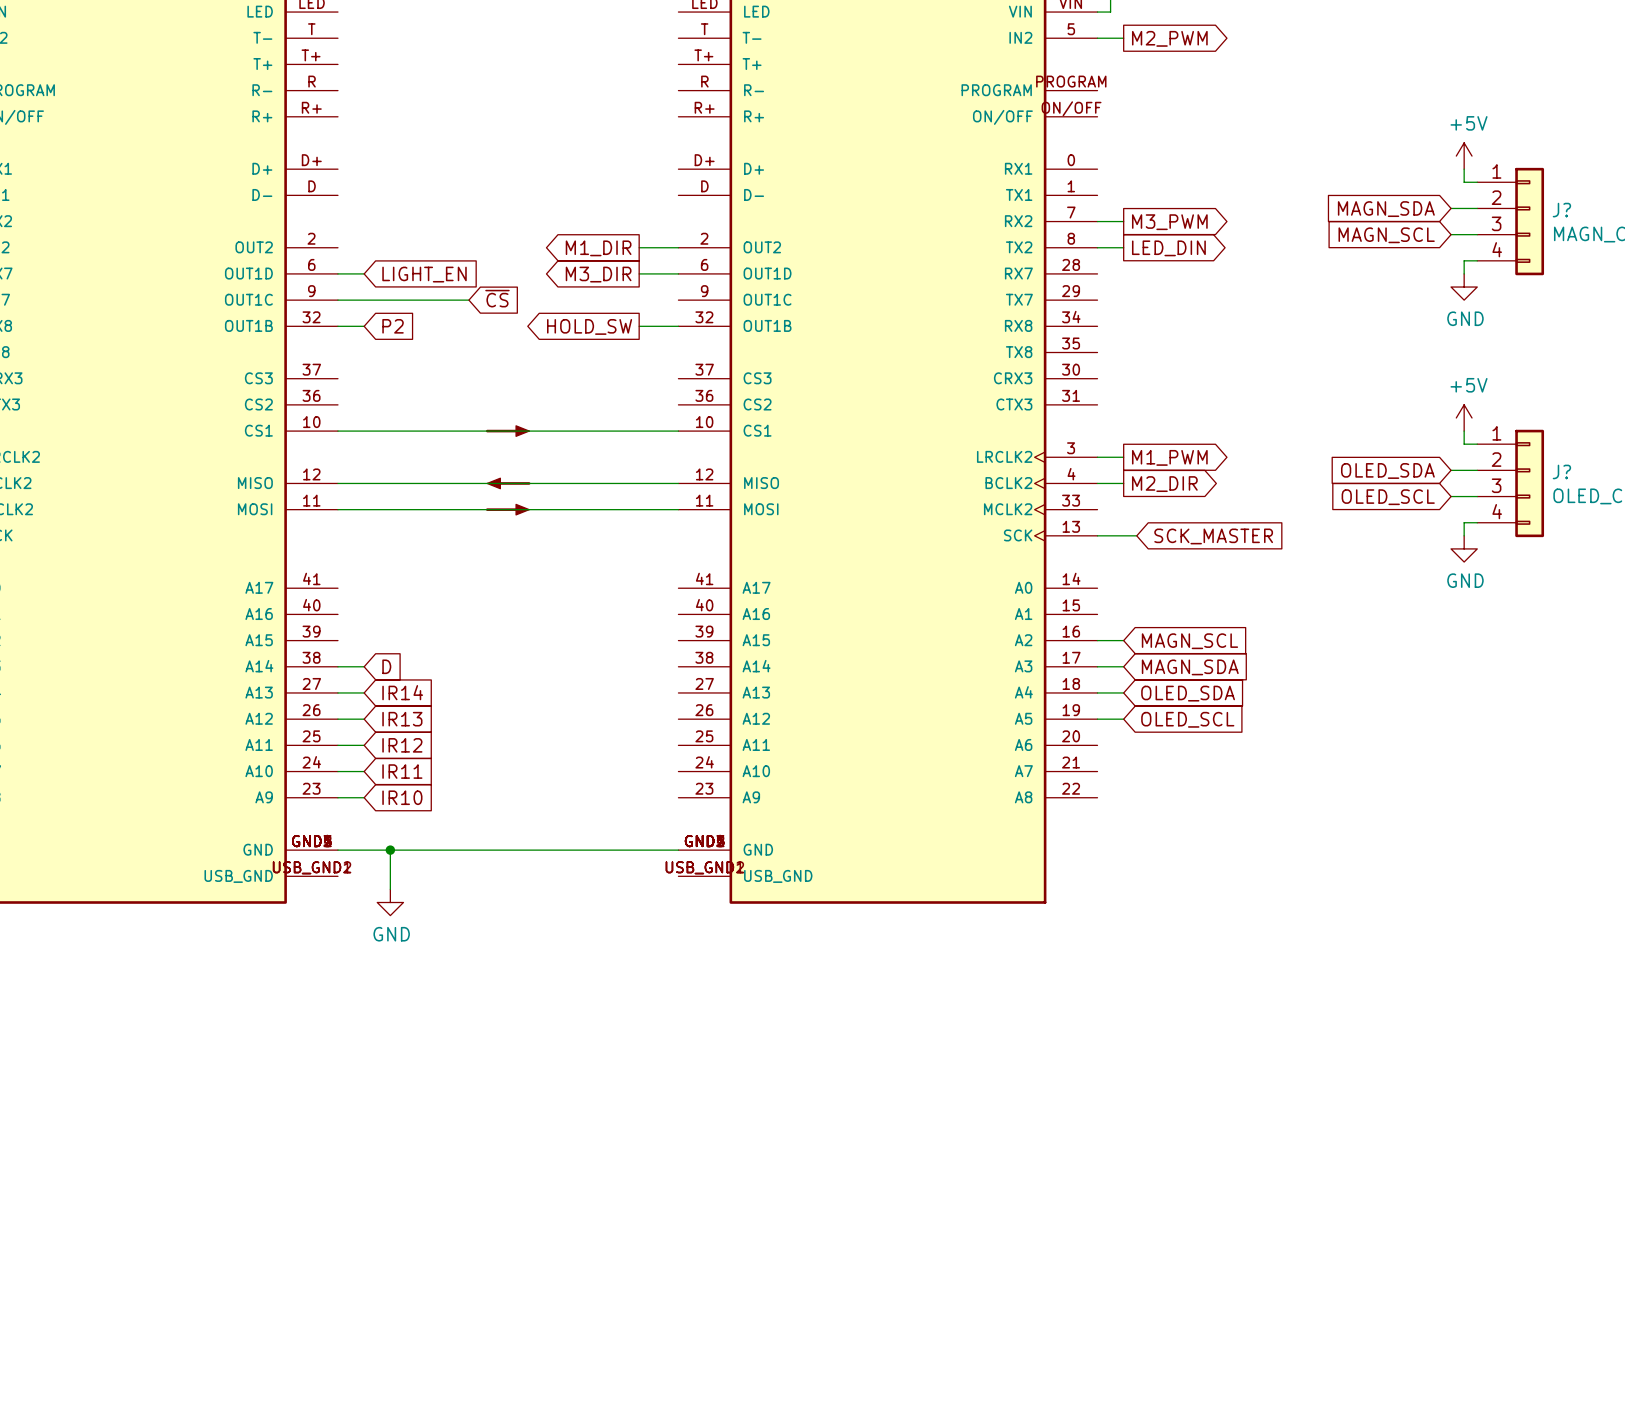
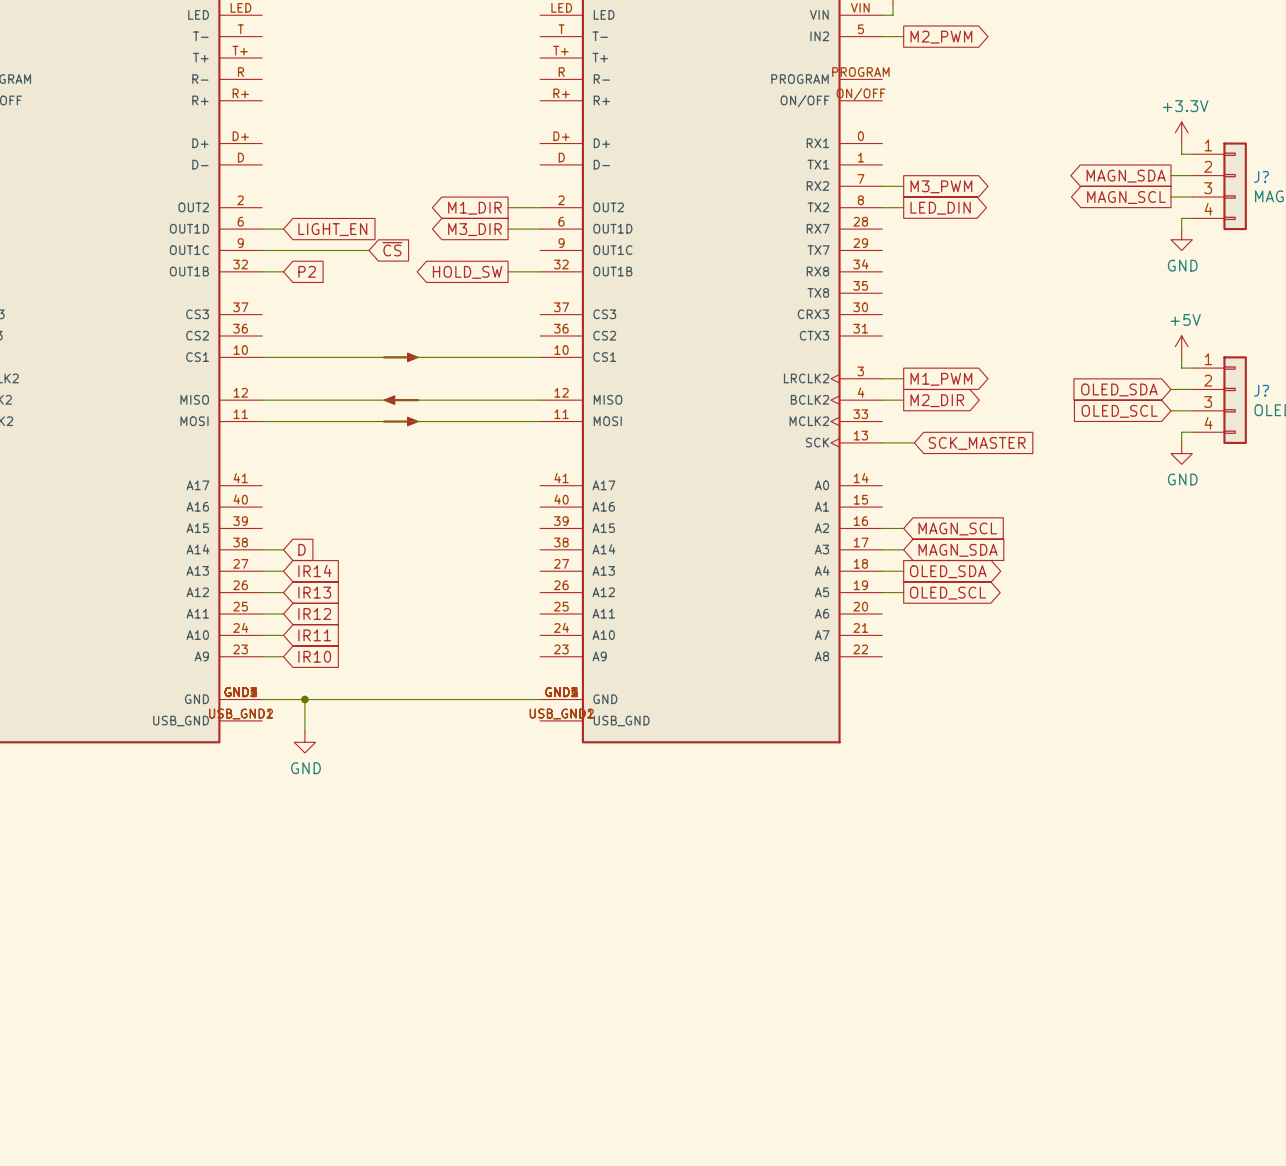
power symbol: +5V (1464, 156) -> +3.3V (1181, 132)
global label shape: input (1386, 209) -> output (1126, 176)
global label shape: input (1386, 235) -> output (1126, 197)
global label shape: input (1188, 693) -> output (948, 571)
global label shape: input (1187, 719) -> output (948, 593)

